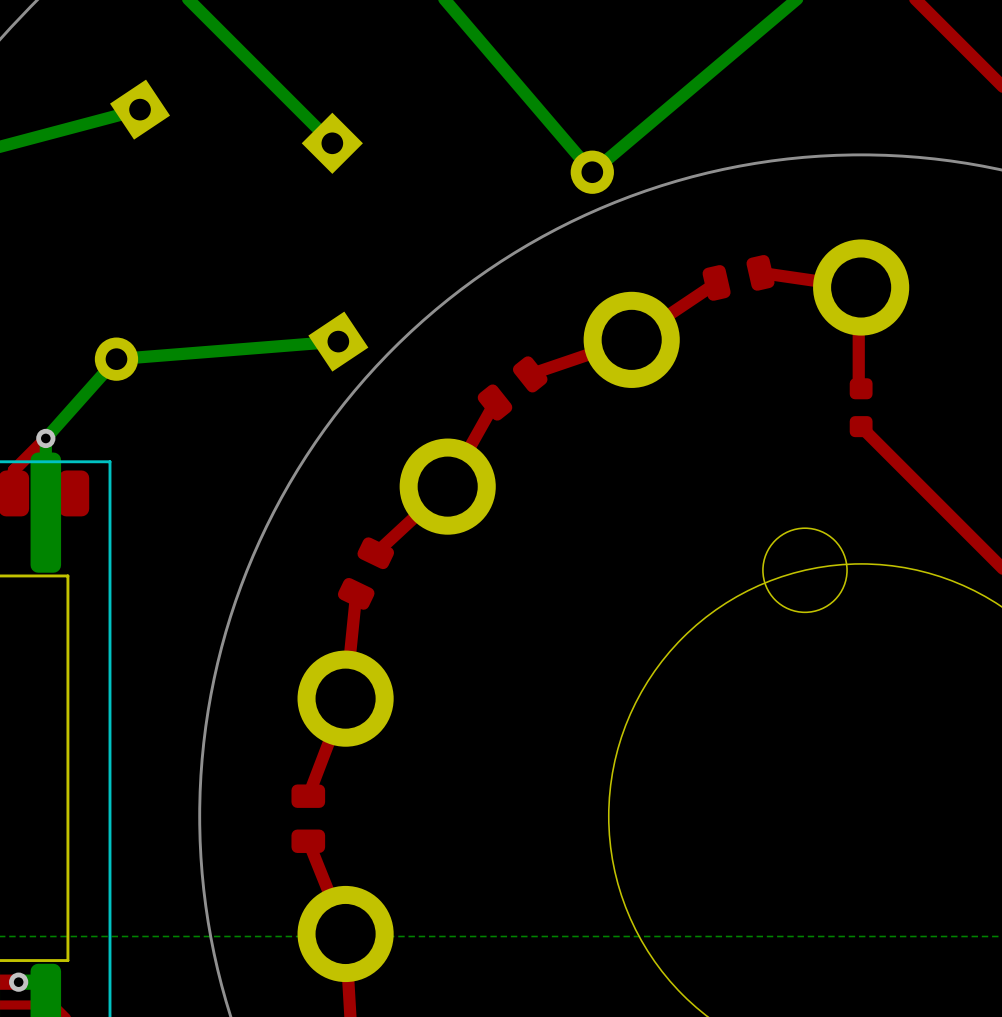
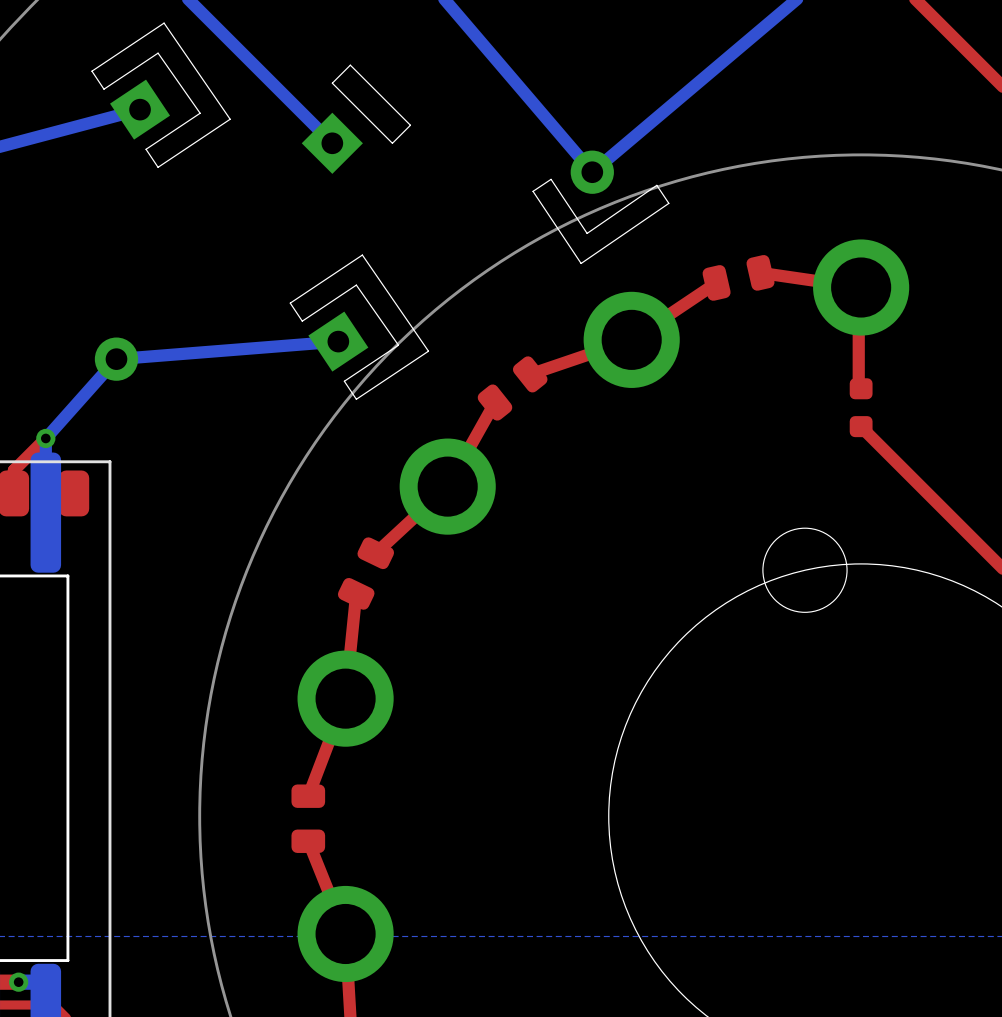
board edge: none -> (164, 23) (91, 71) (103, 89) (158, 53) (200, 113) (146, 149) (158, 167) (230, 119) (164, 23)
board edge: none -> (350, 65) (410, 125) (392, 143) (332, 83) (350, 65)
board edge: none -> (551, 179) (587, 233) (656, 185) (668, 203) (581, 263) (533, 191) (551, 179)
board edge: none -> (362, 255) (428, 351) (356, 399) (344, 381) (398, 345) (356, 285) (302, 321) (290, 303) (362, 255)

